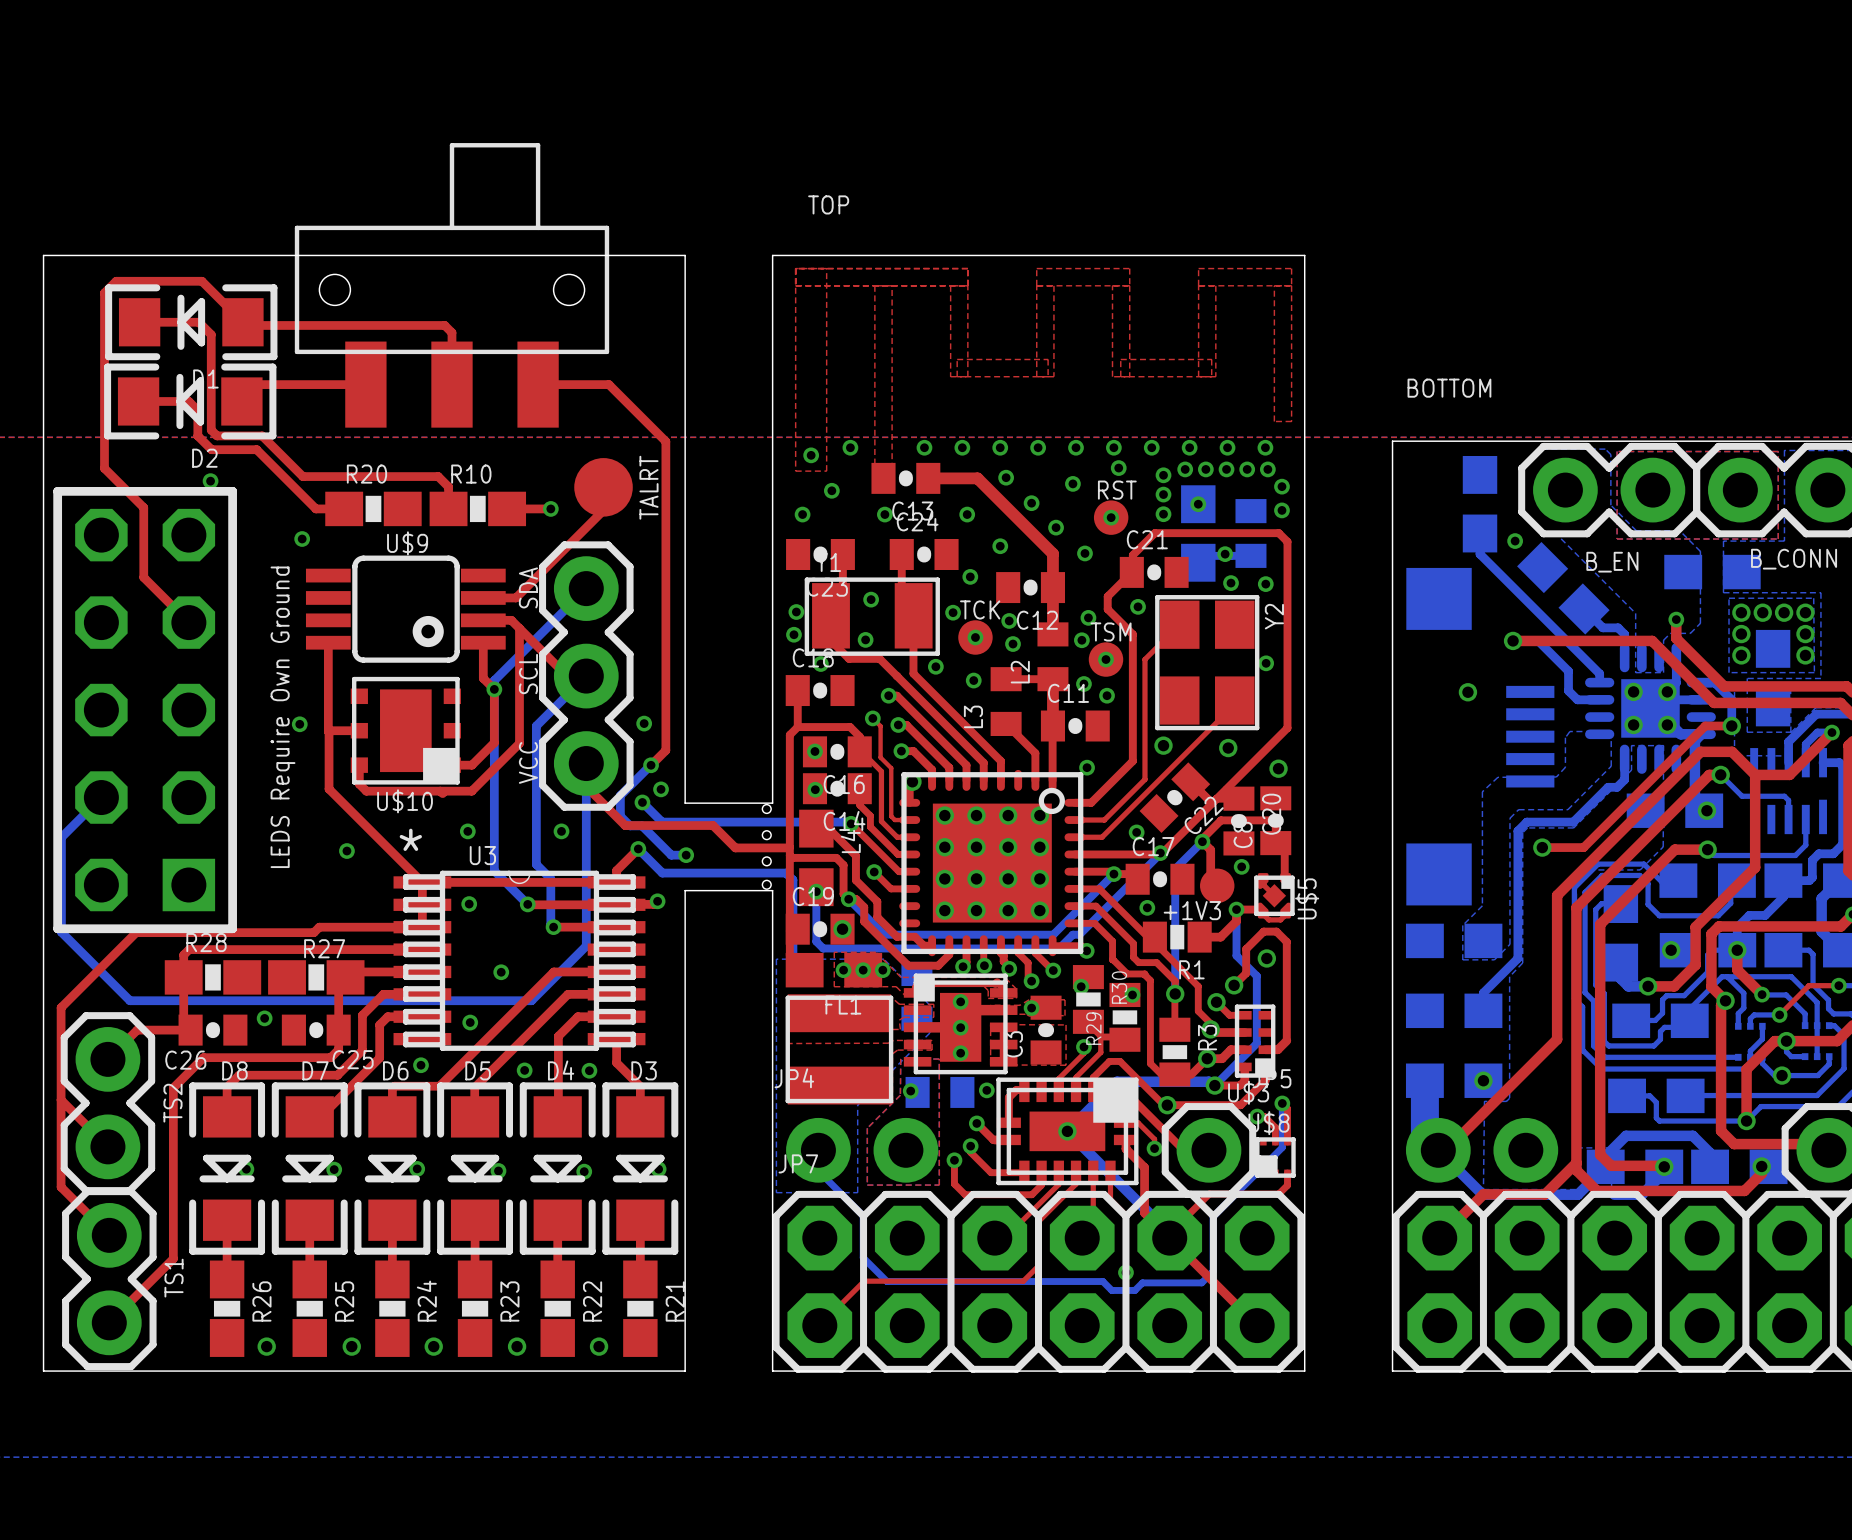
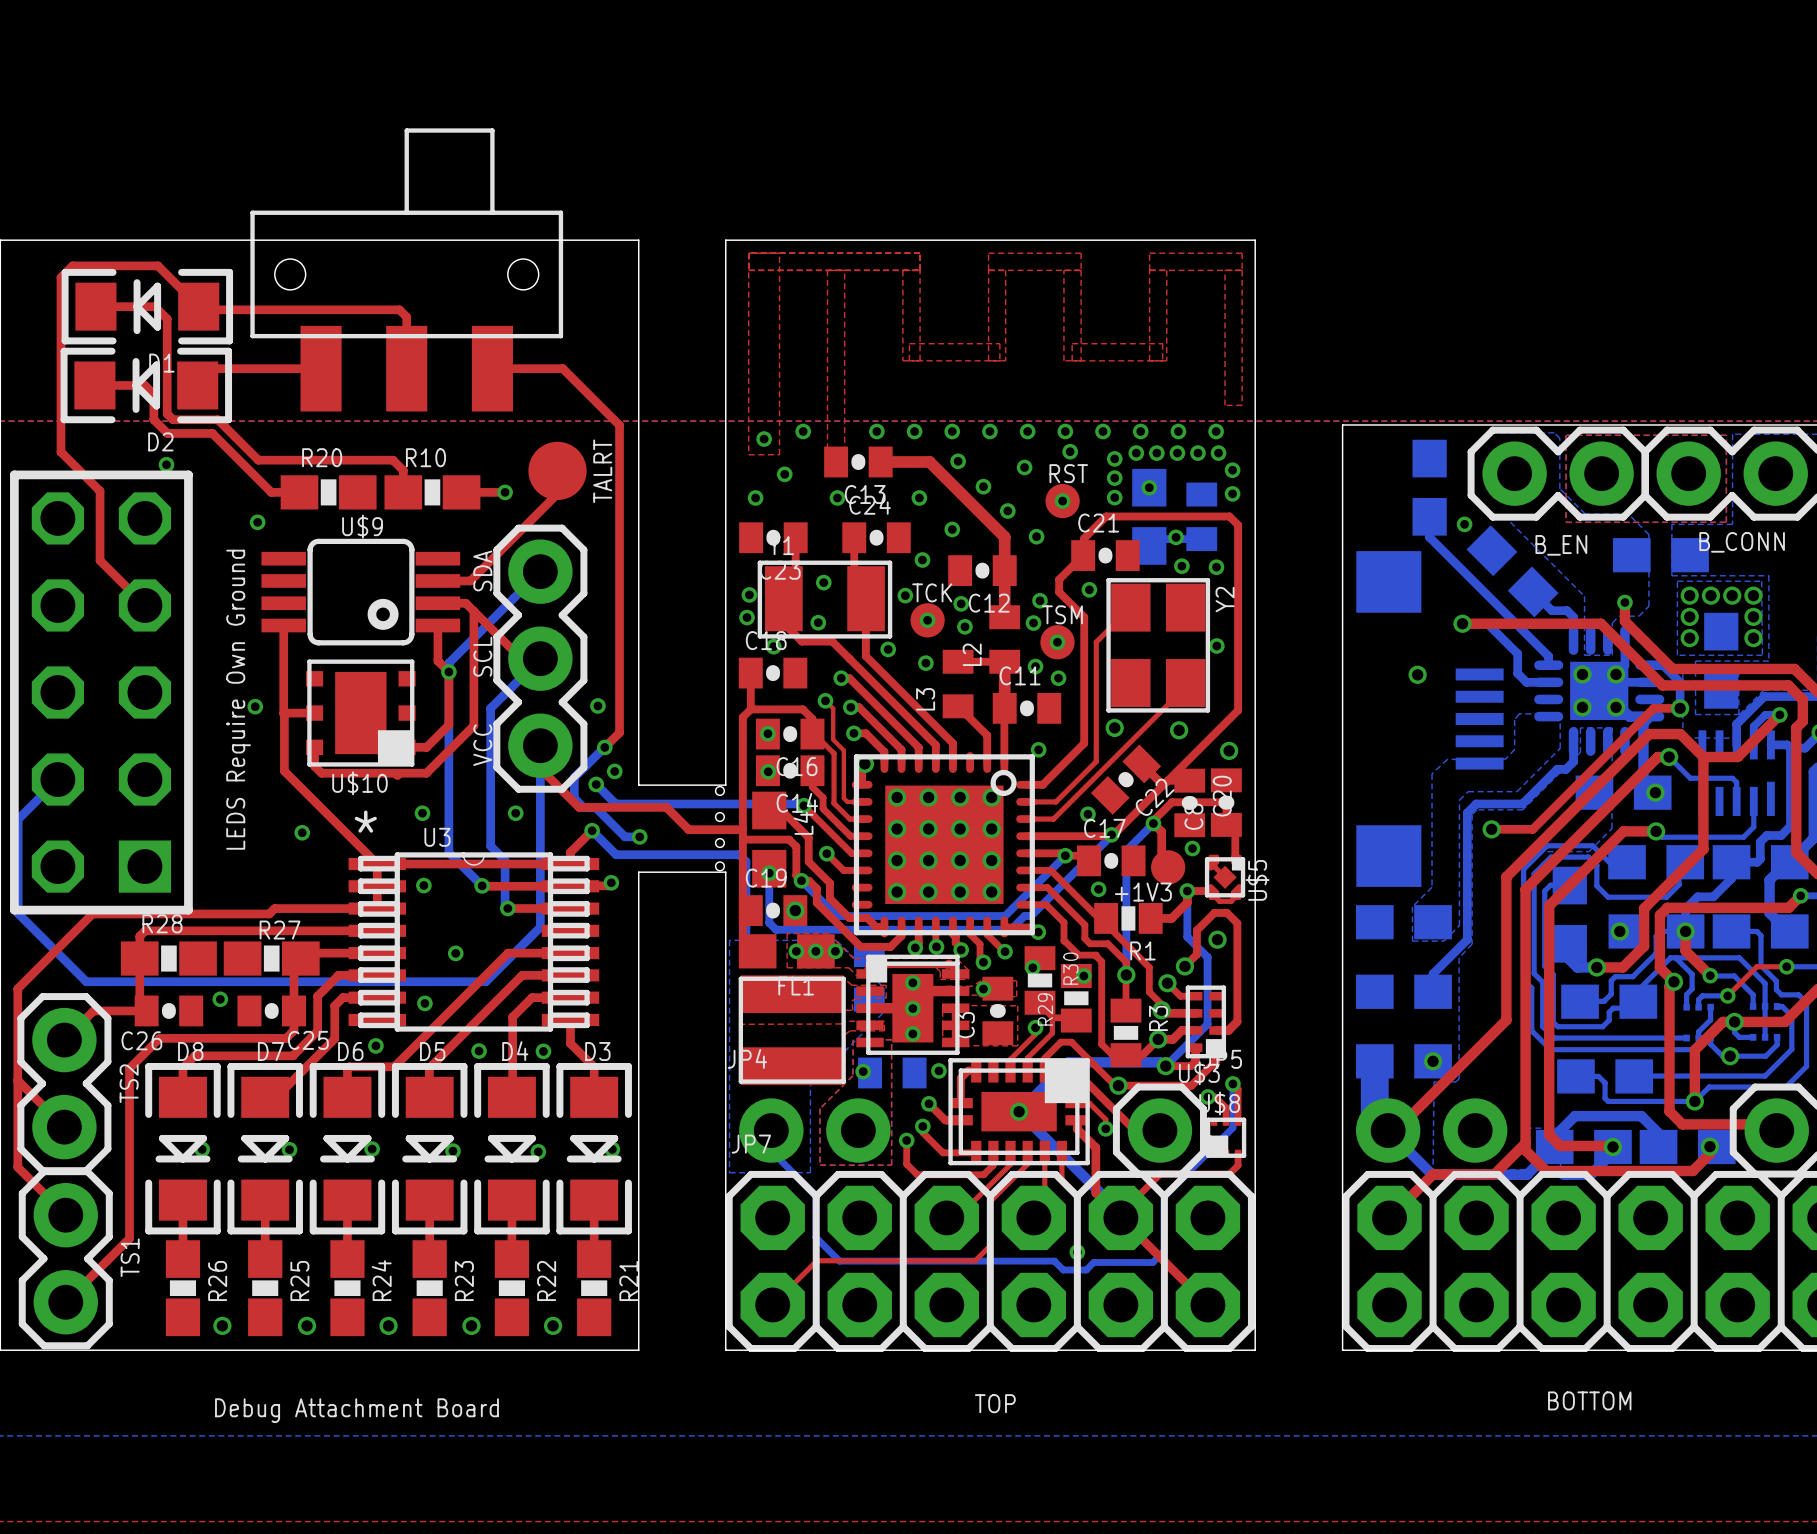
text: TOP (828, 204) -> none
text: BOTTOM (1449, 388) -> none
text: none -> BOTTOM (1589, 1400)
text: none -> TOP (995, 1403)
text: none -> Debug Attachment Board (356, 1410)

